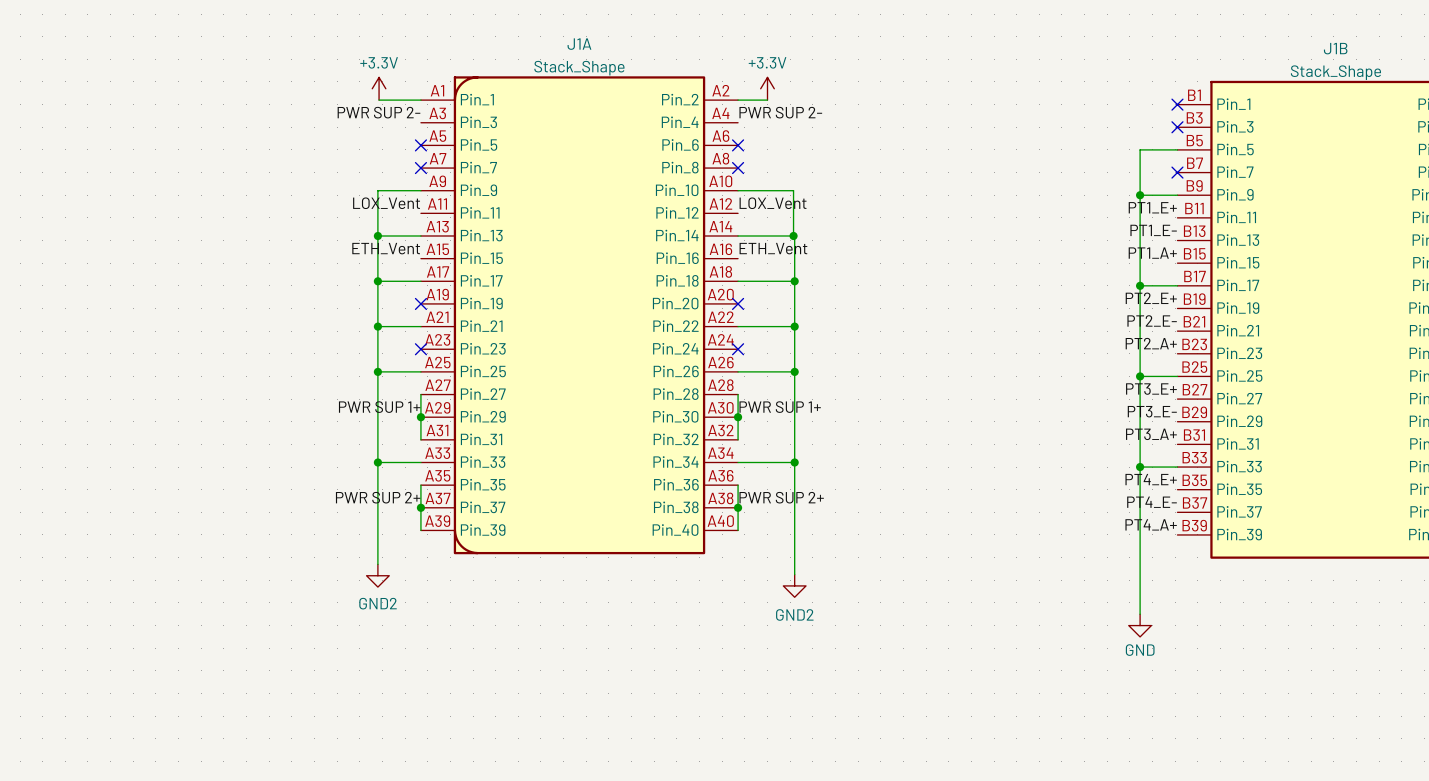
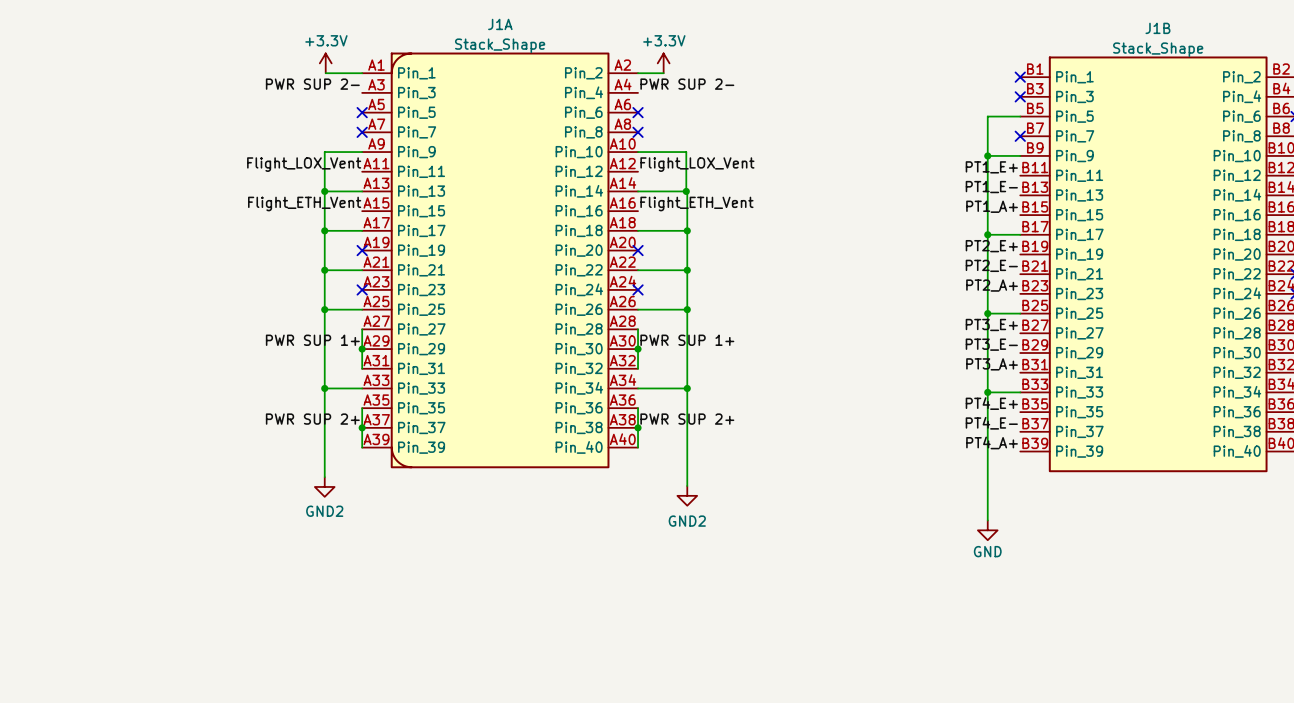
label: LOX_Vent (386, 203) -> Flight_LOX_Vent (304, 164)
label: LOX_Vent (773, 203) -> Flight_LOX_Vent (697, 164)
label: ETH_Vent (386, 248) -> Flight_ETH_Vent (304, 203)
label: ETH_Vent (773, 248) -> Flight_ETH_Vent (696, 203)

